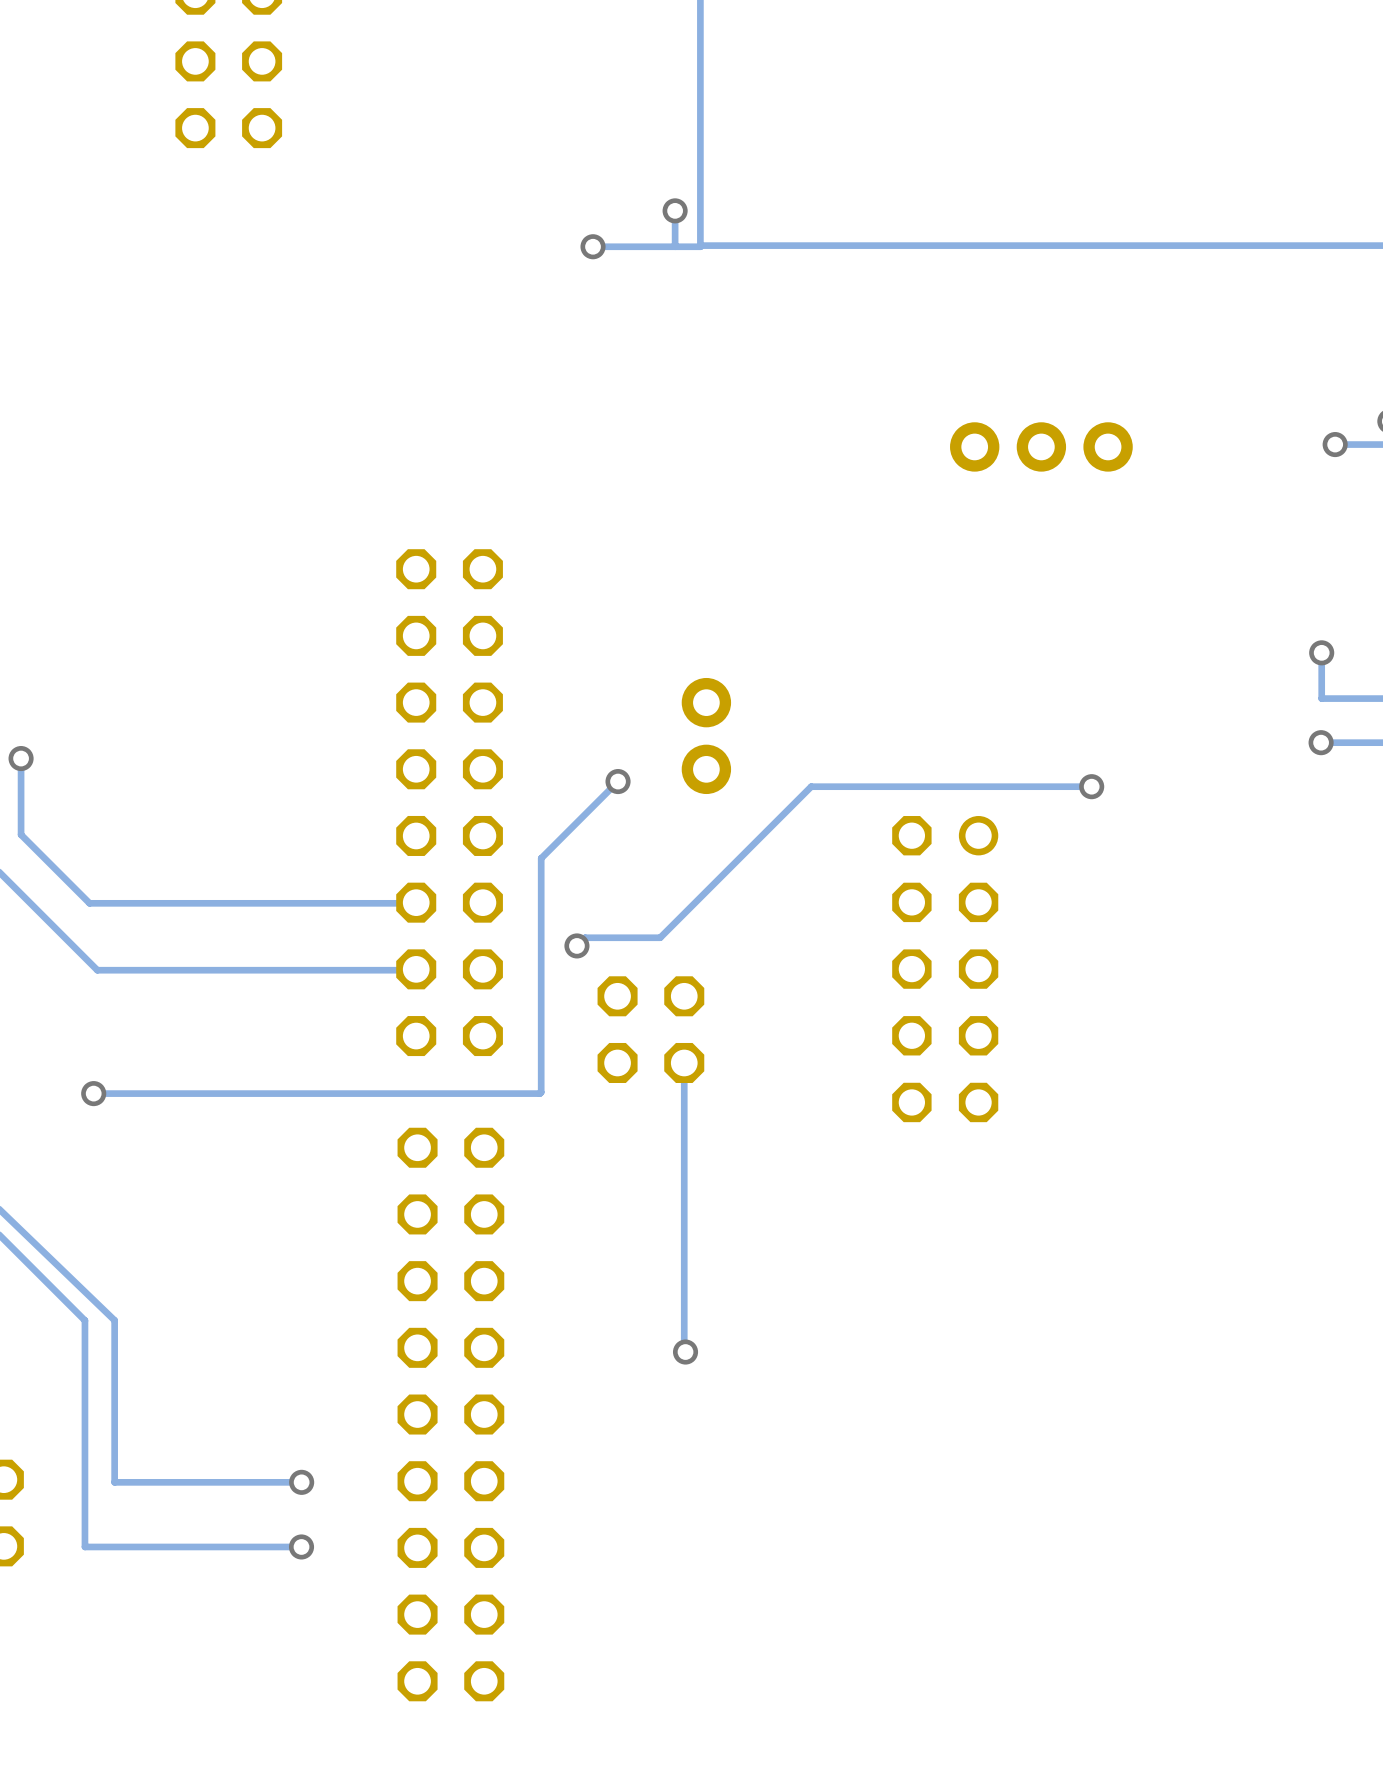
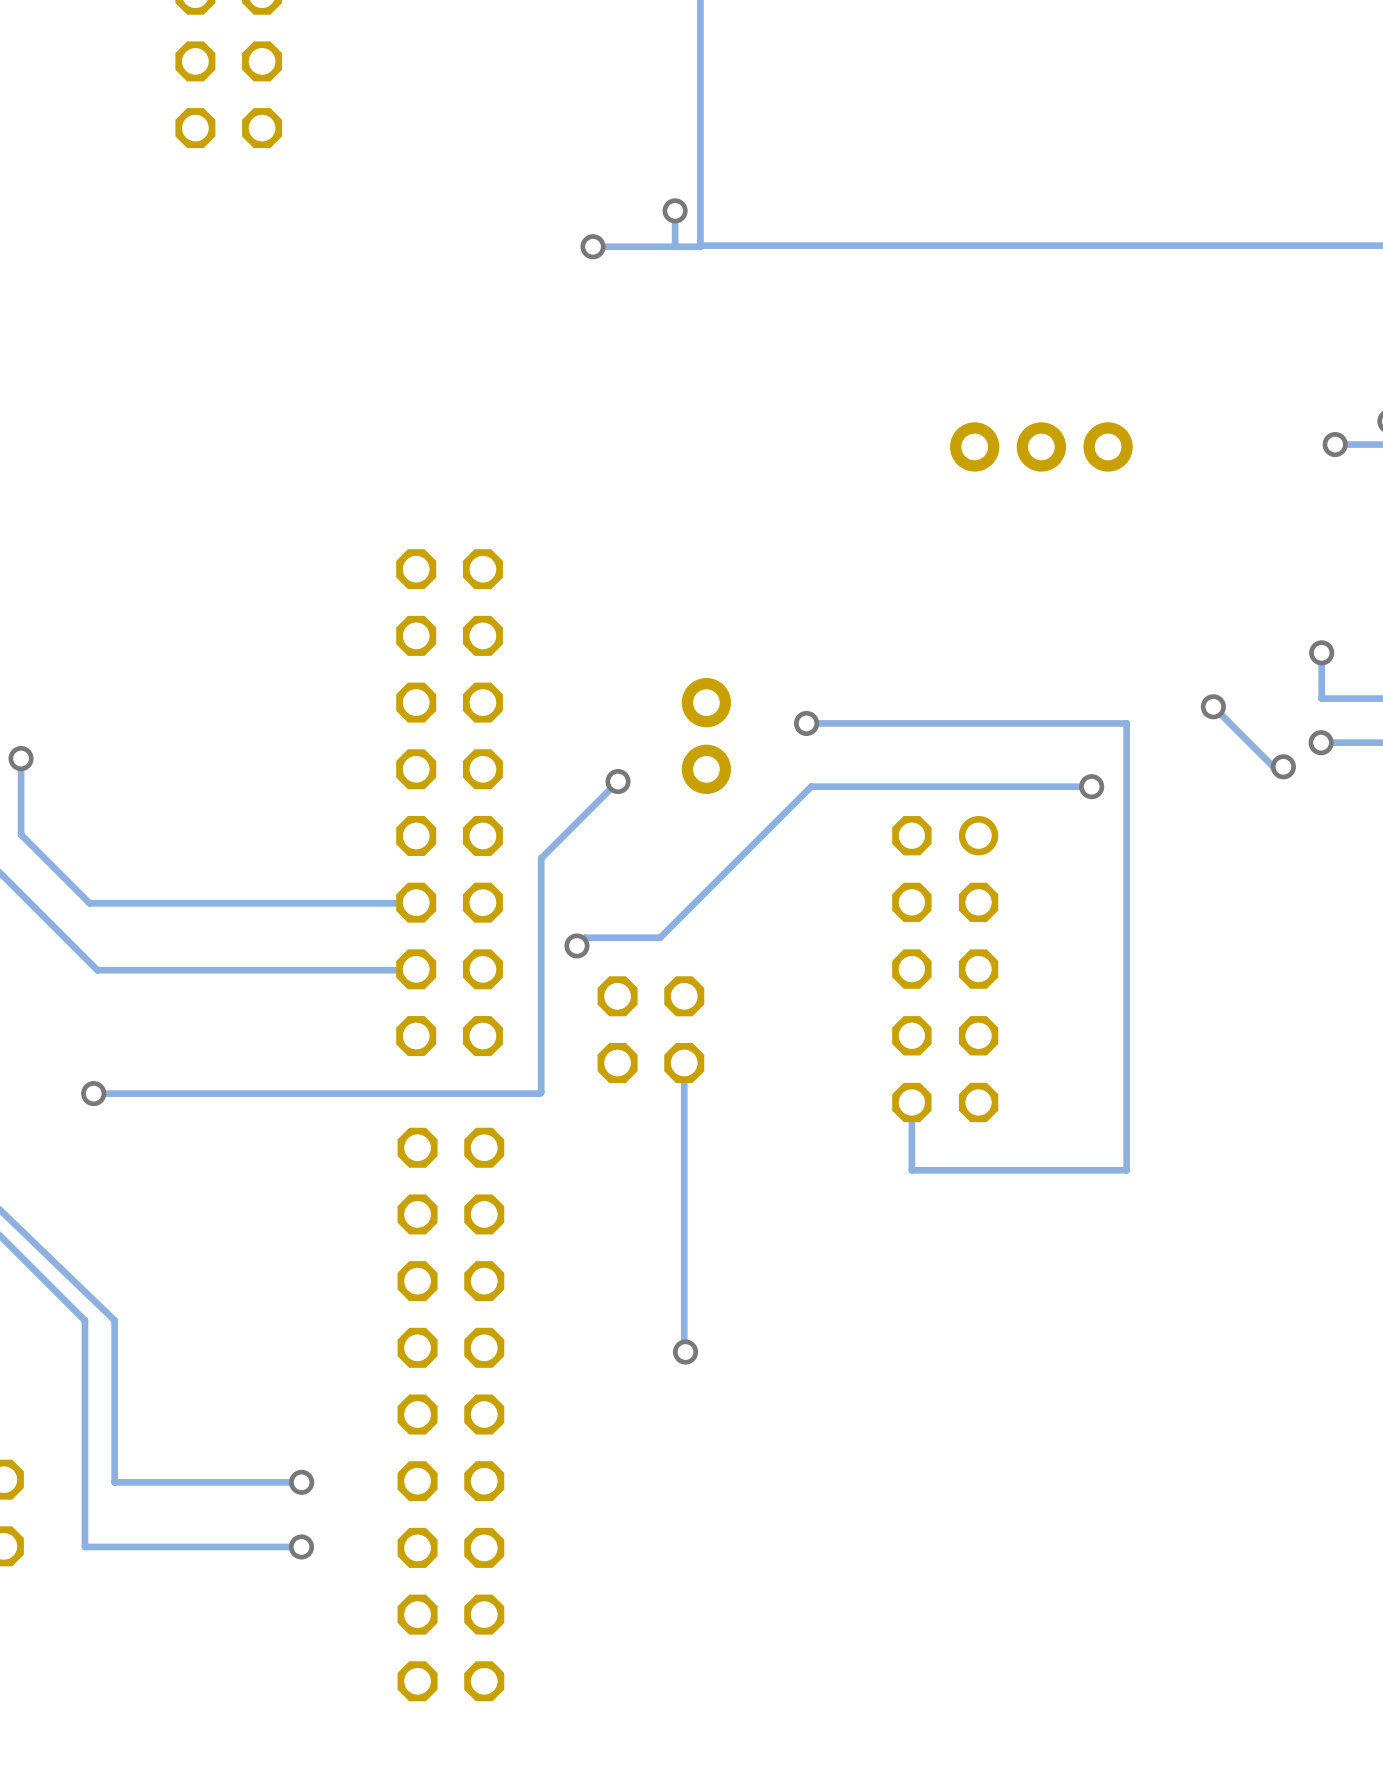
track: none -> (1213, 706) (1273, 766) (1283, 766)
via: none -> (1213, 706)
track: none -> (806, 723) (1126, 723) (1126, 1170) (911, 1170) (911, 1102)
via: none -> (806, 723)
via: none -> (1283, 766)

